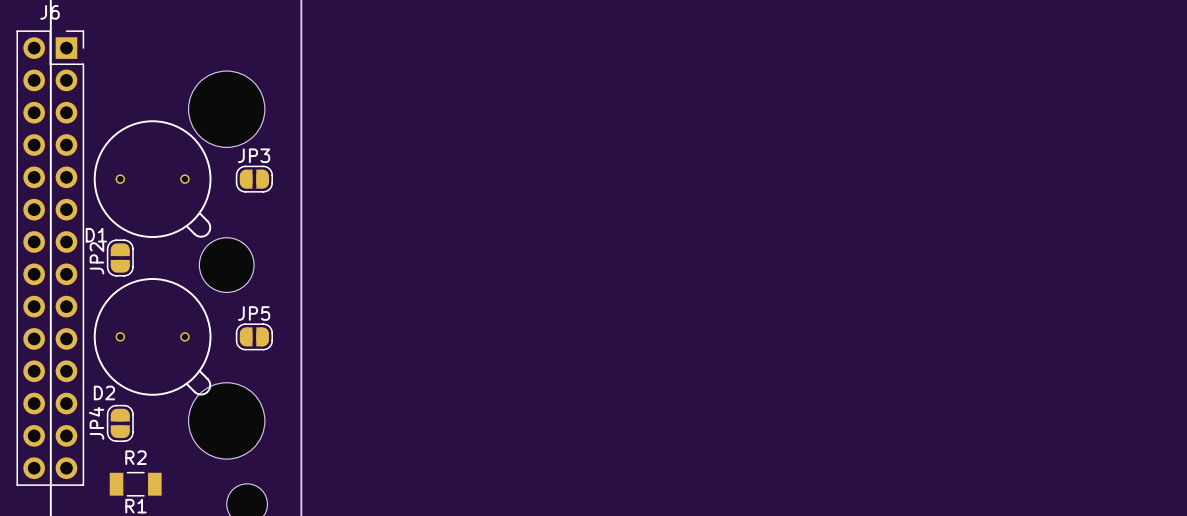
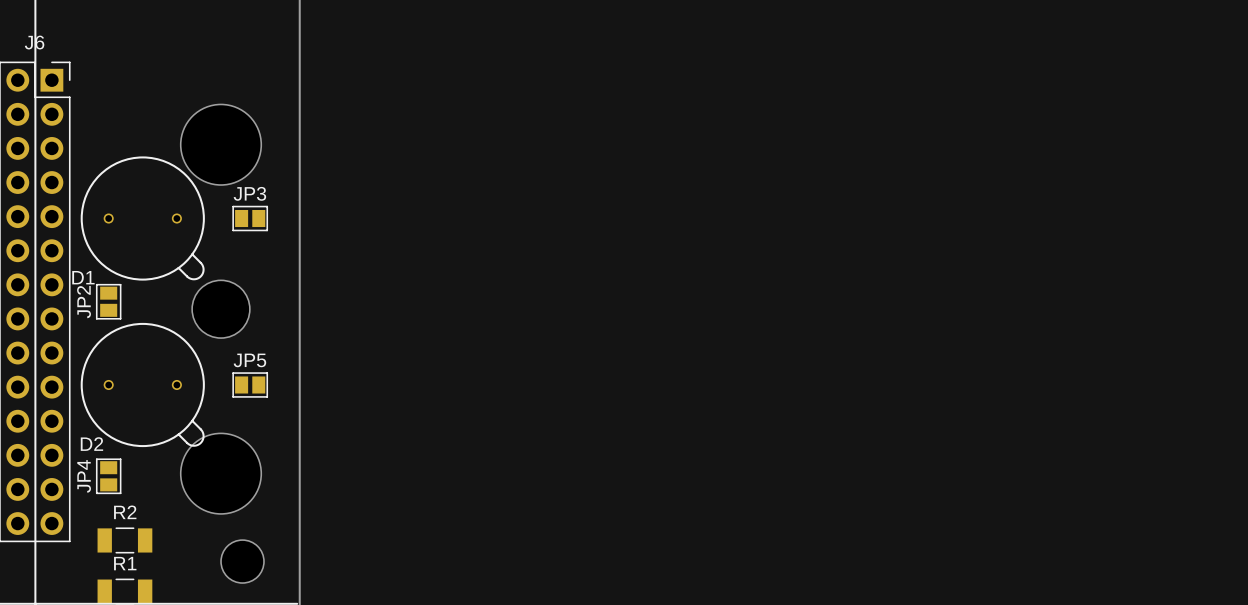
JP3 footprint: [235, 165, 273, 193] -> [232, 205, 269, 232]
JP2 footprint: [106, 239, 134, 277] -> [95, 283, 122, 320]
JP5 footprint: [235, 323, 273, 351] -> [232, 372, 269, 398]
JP4 footprint: [106, 404, 134, 442] -> [95, 458, 122, 495]

